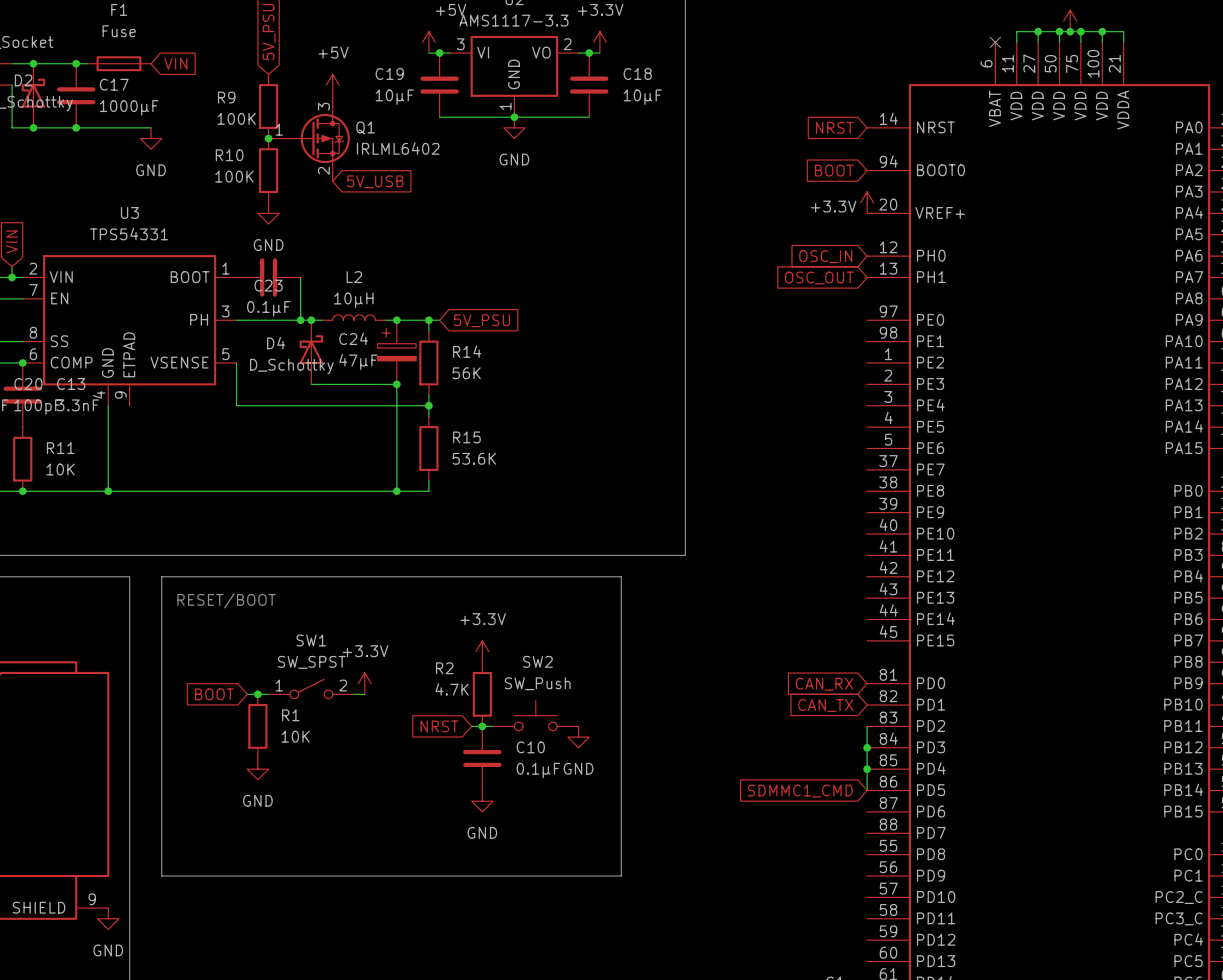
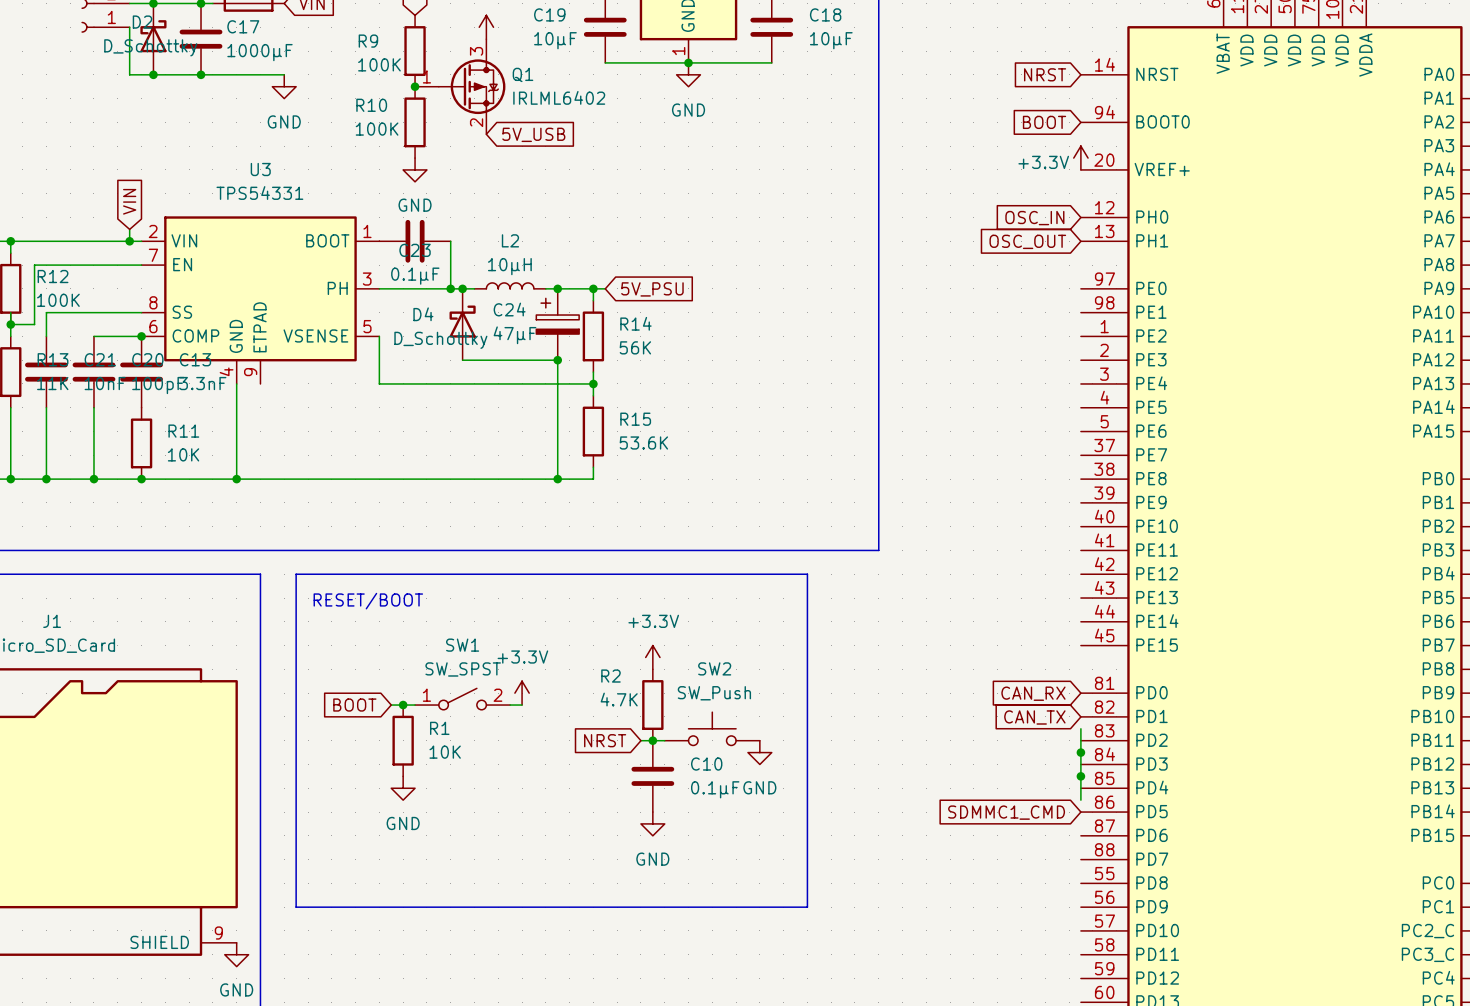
junction: none -> (1080, 752)
junction: (867, 747) -> none
junction: none -> (1080, 776)
junction: (867, 769) -> none
wire: (867, 779) (867, 790) -> (1080, 728) (1080, 740)

